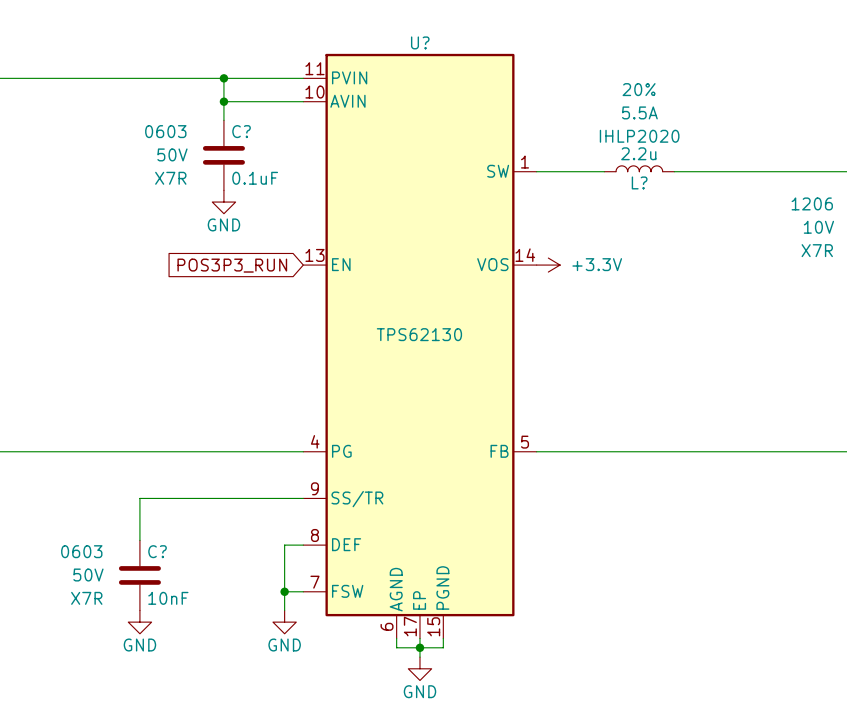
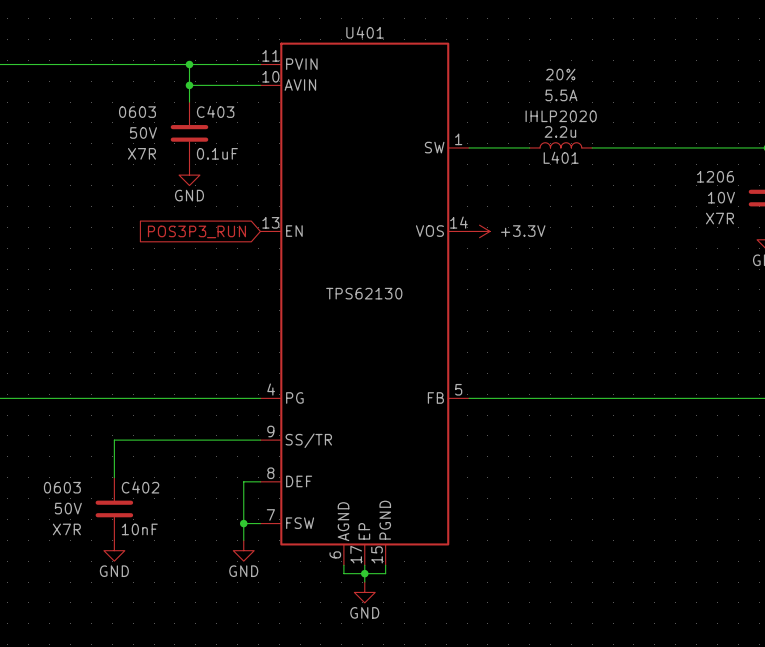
U? name: U? (420, 42) -> U401 (365, 32)
C? name: C? (241, 131) -> C403 (215, 111)
L? name: L? (639, 182) -> L401 (561, 157)
C? name: C? (157, 551) -> C402 (140, 487)

